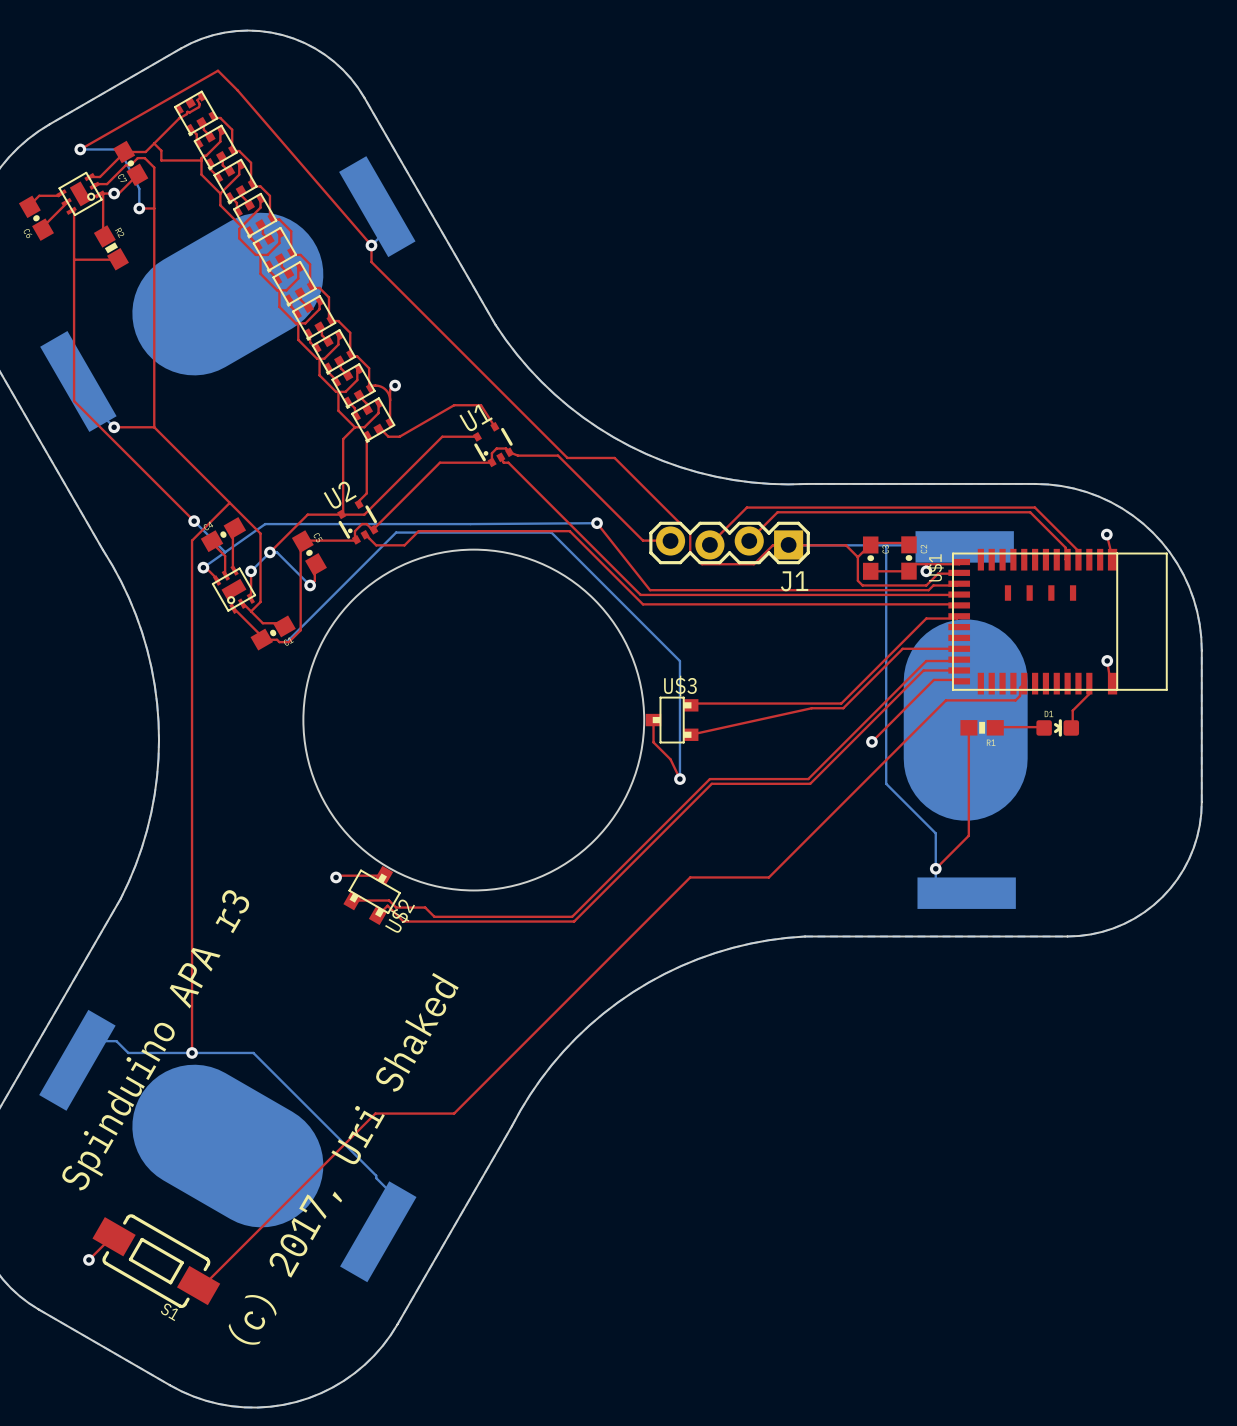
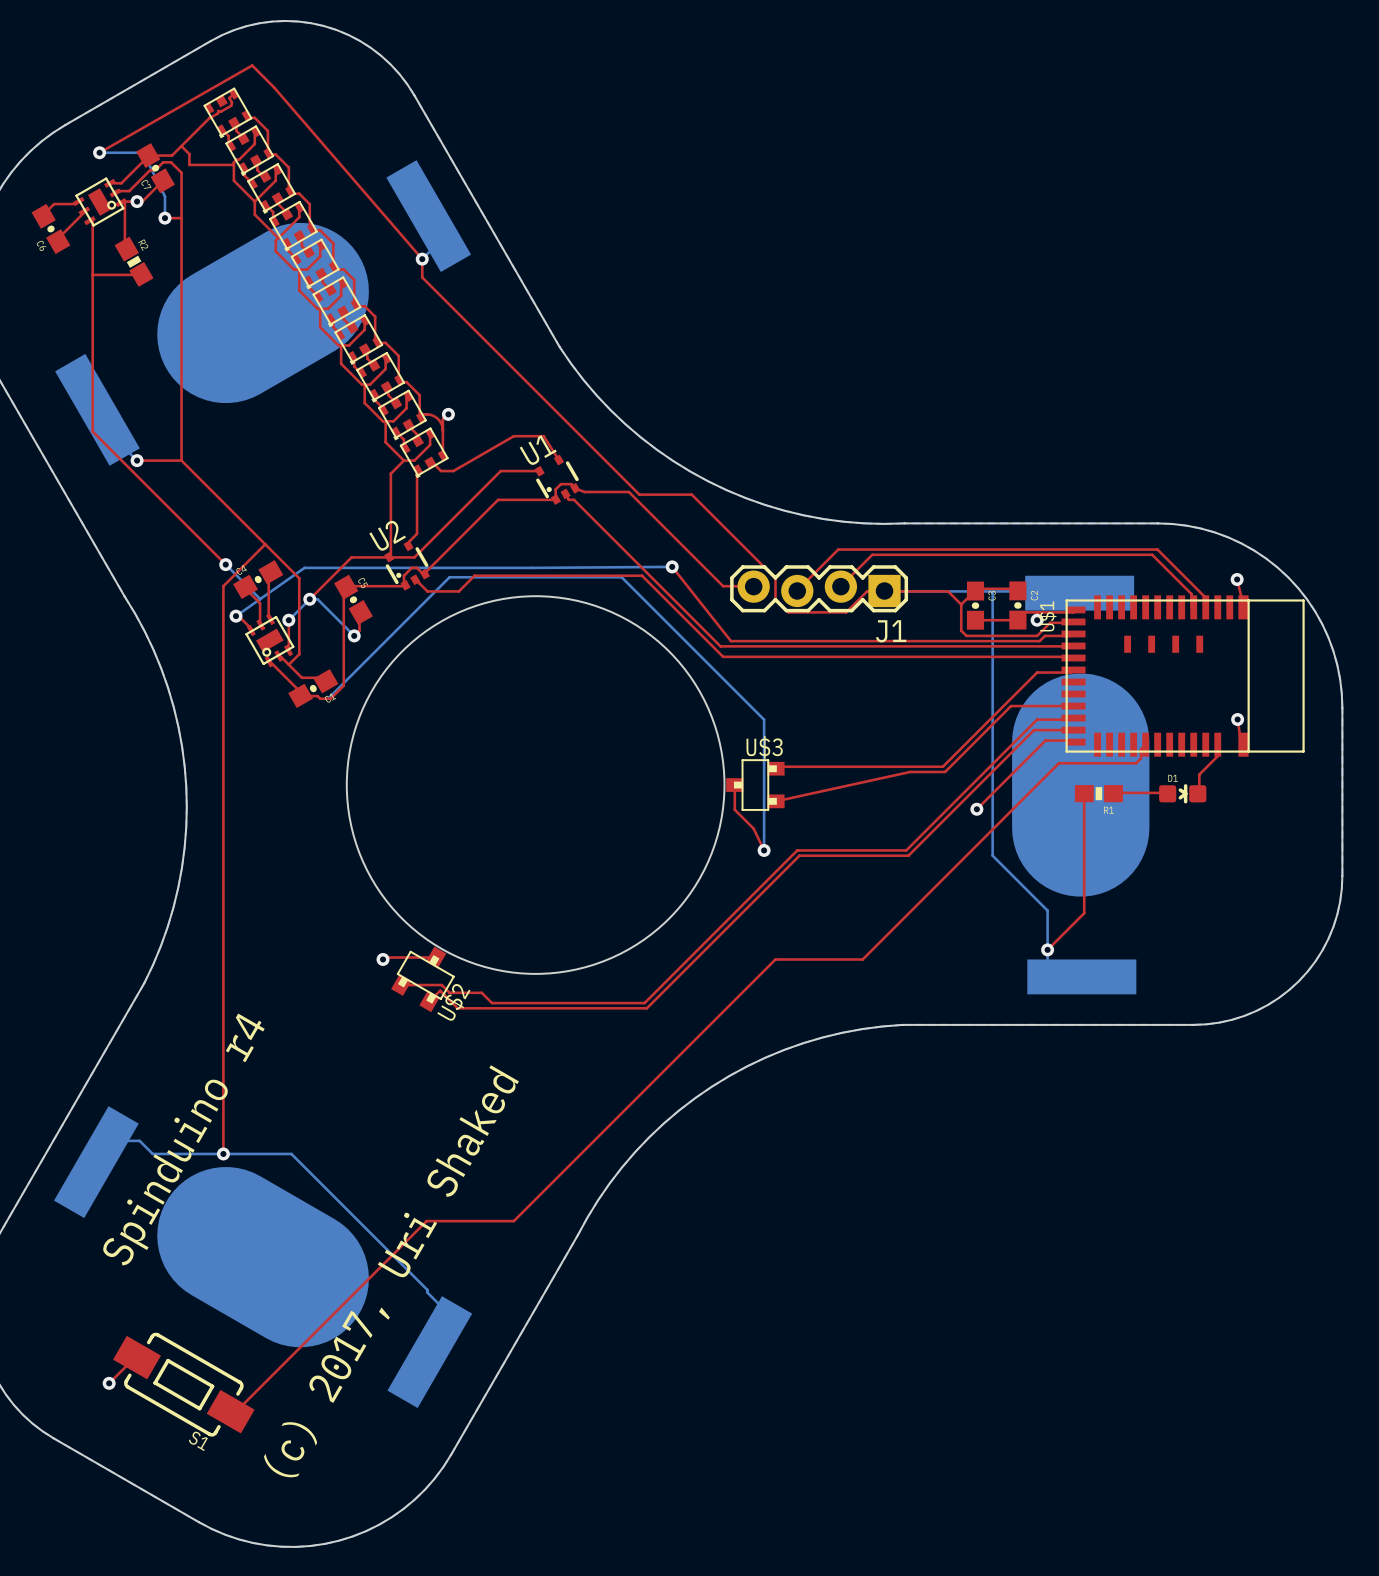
text: Spinduino APA r3 (155, 1040) -> Spinduino r4 (183, 1139)

